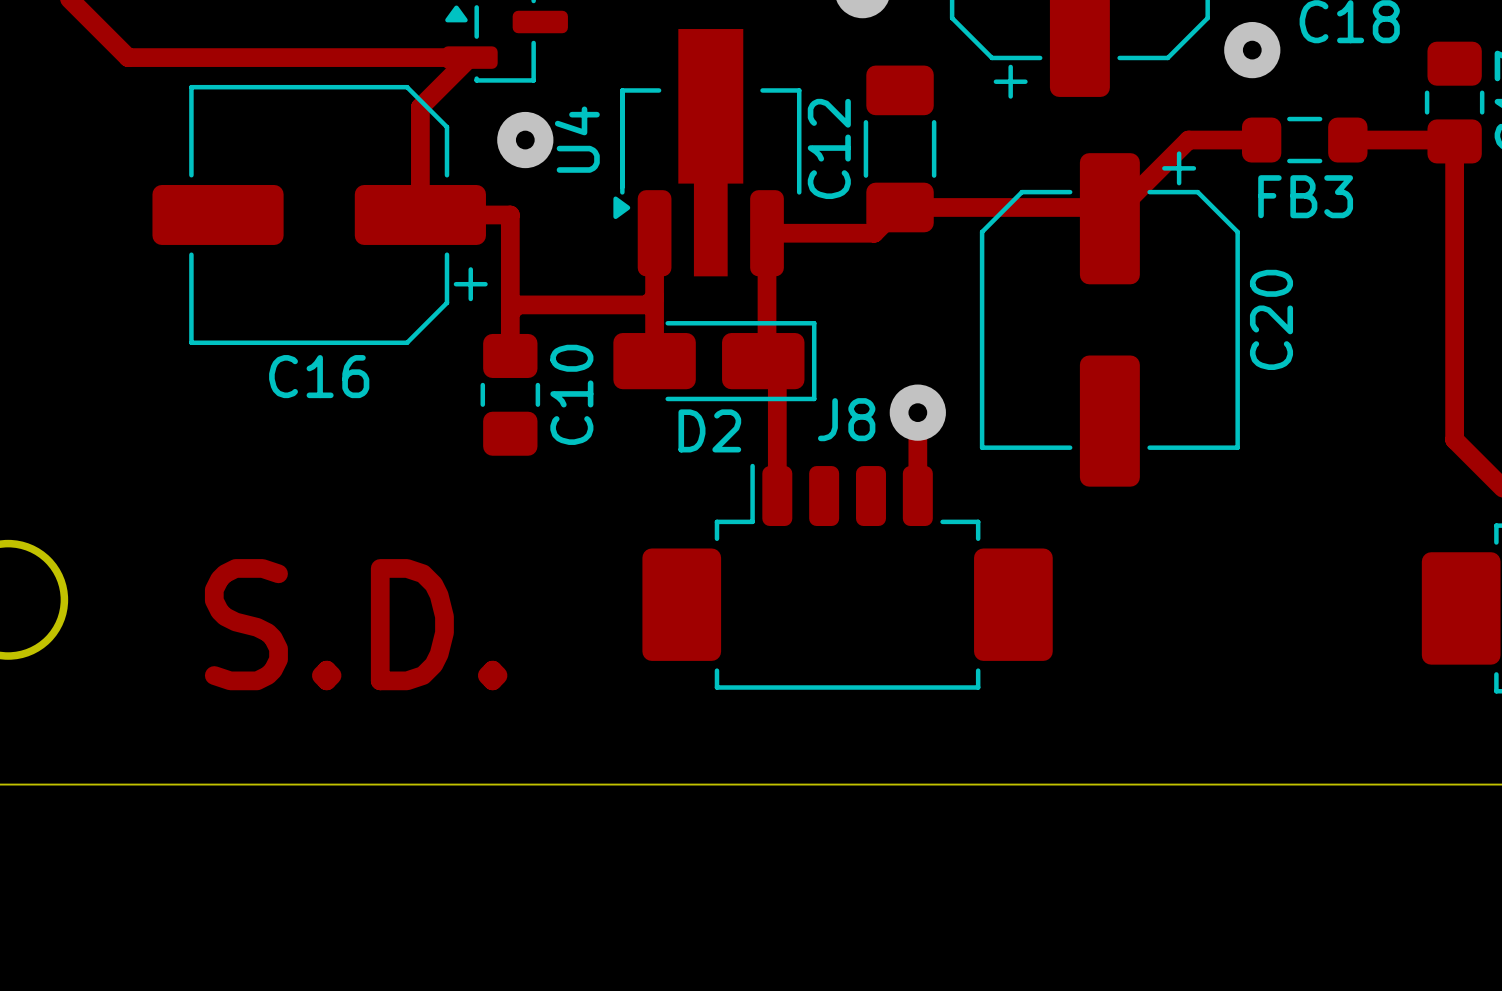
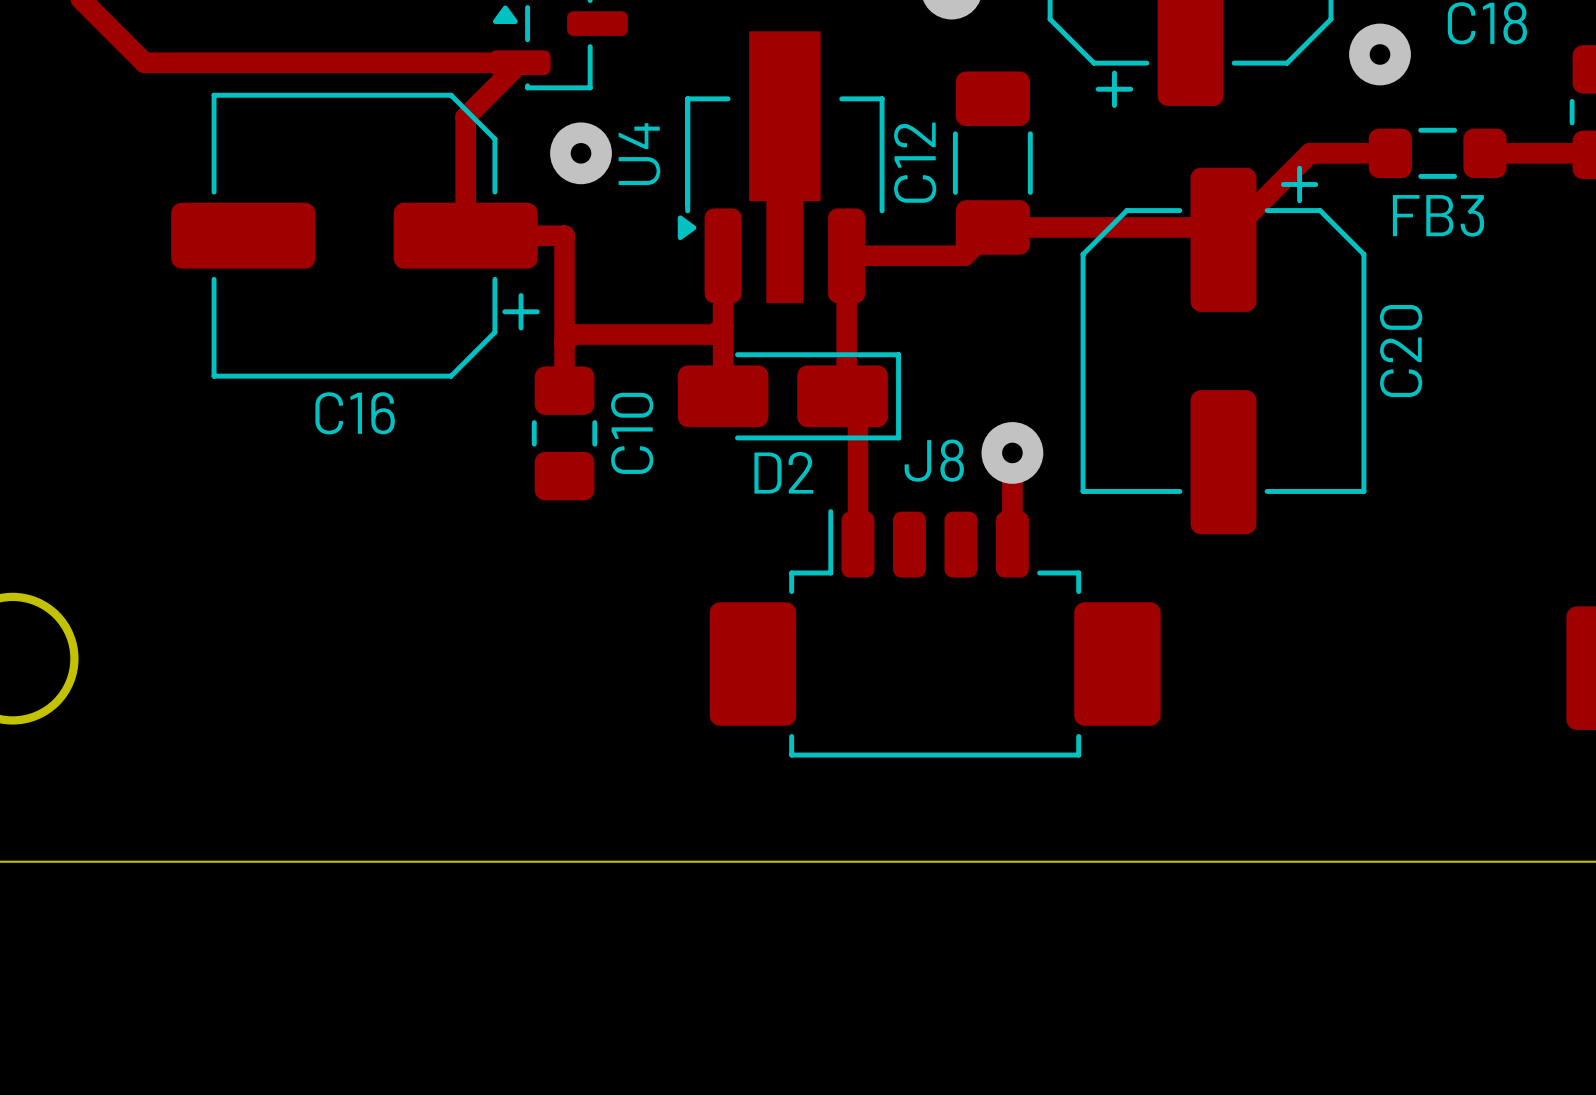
text: S.D. (356, 624) -> none

